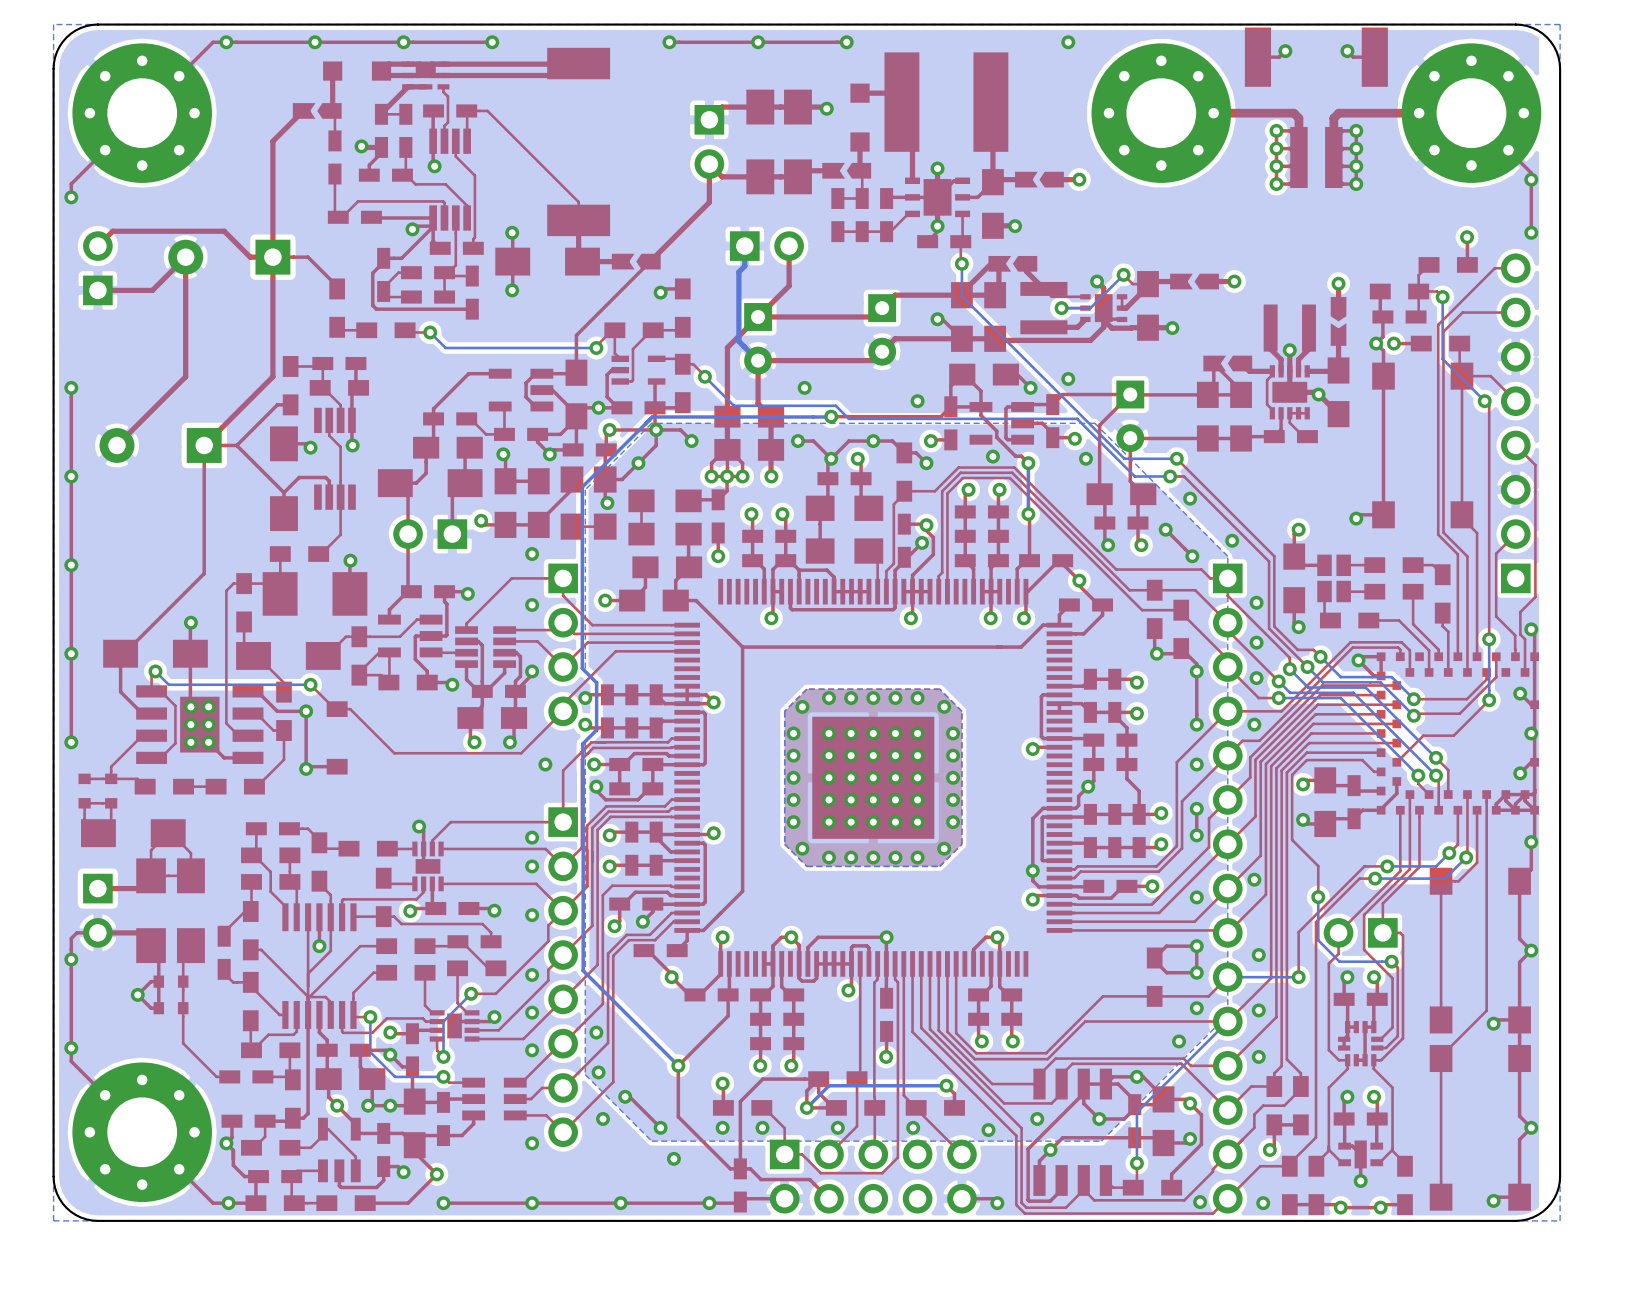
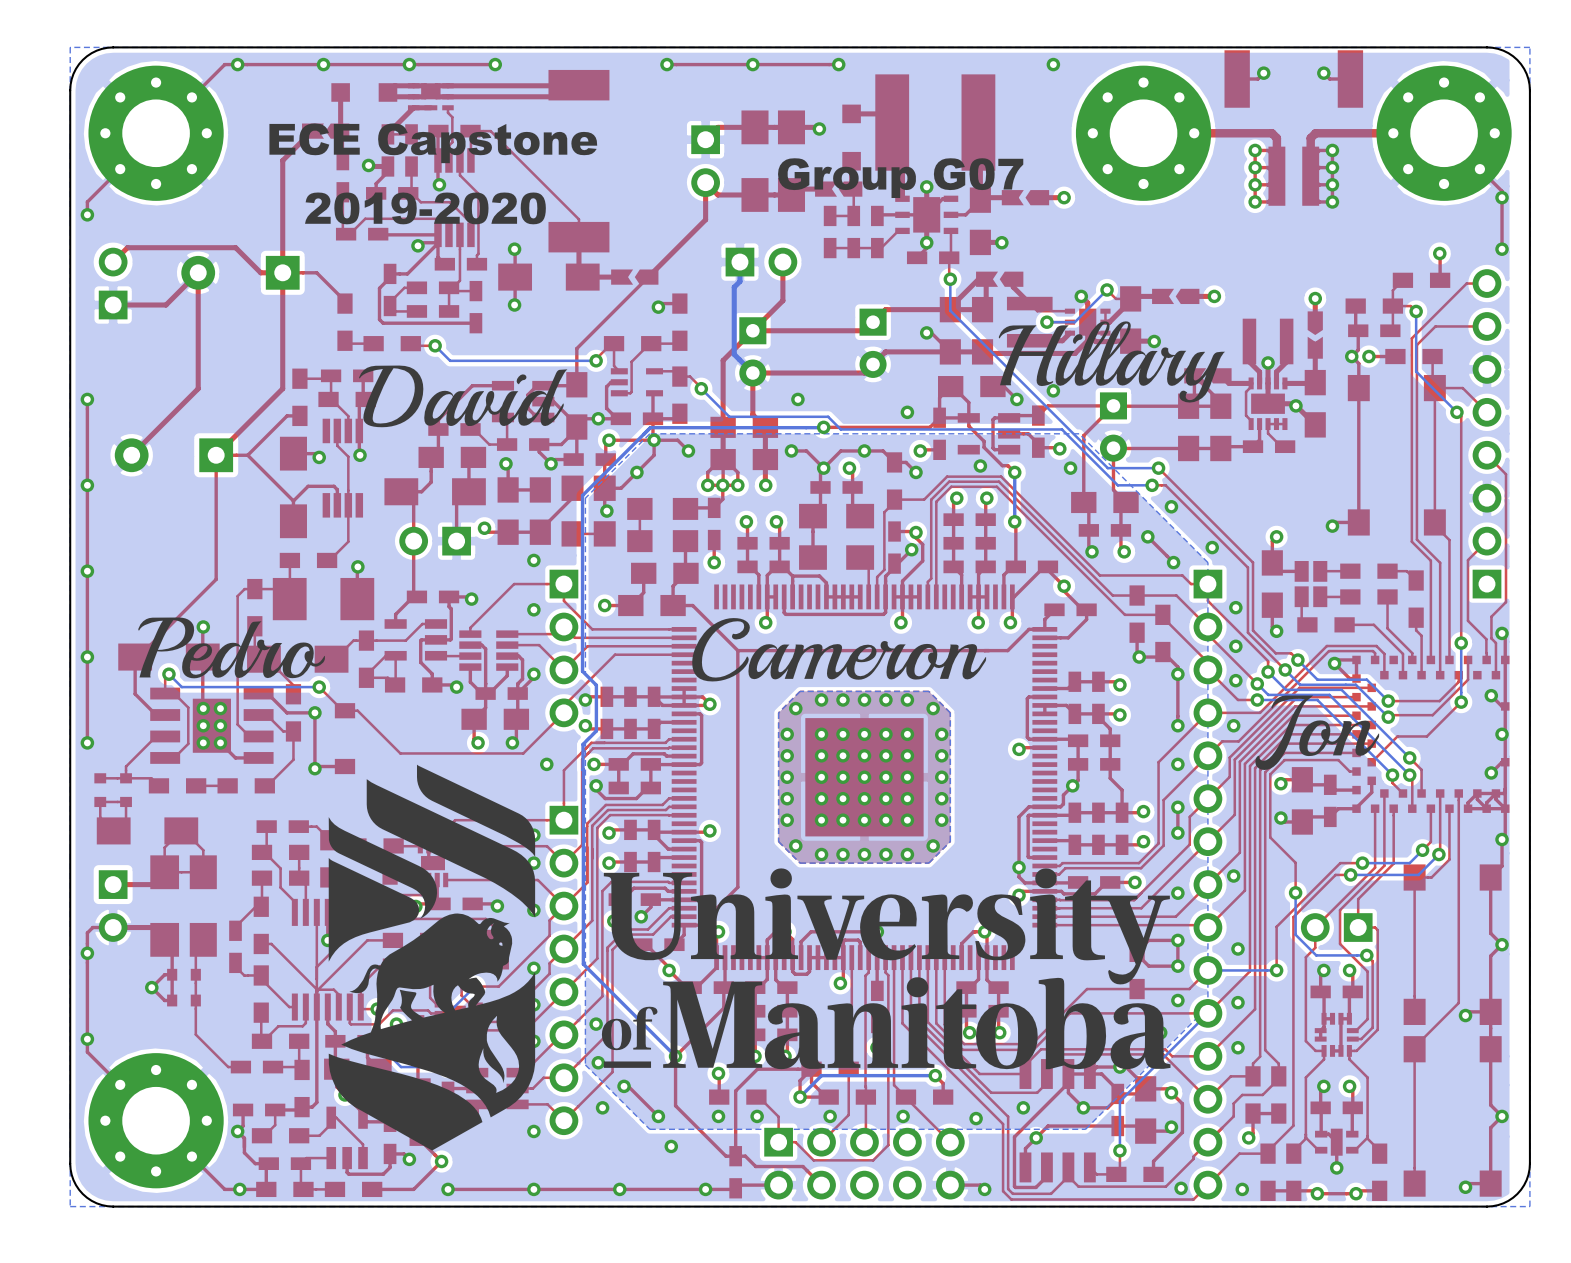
drawing: none -> [138, 123, 1380, 1151]

